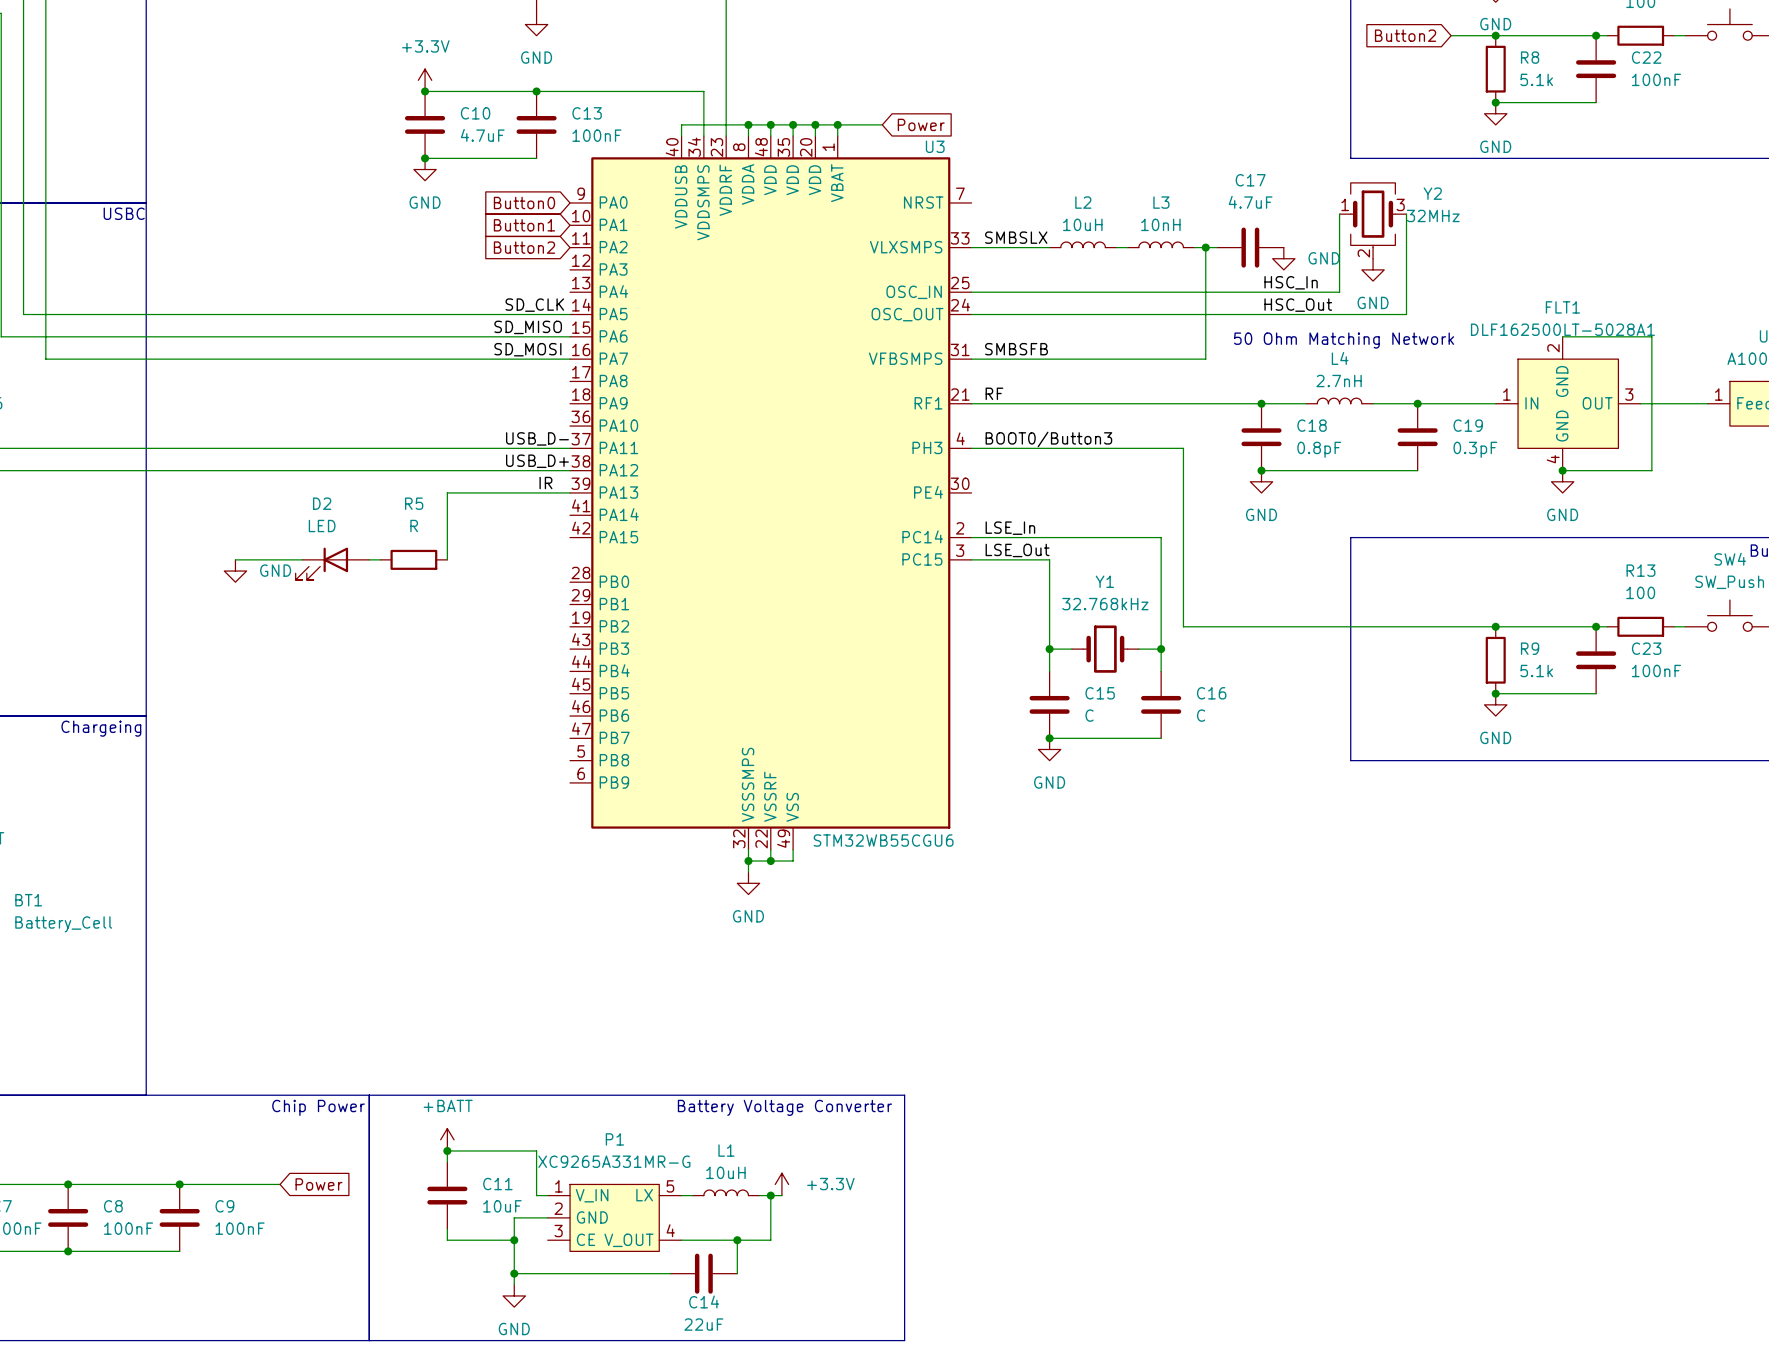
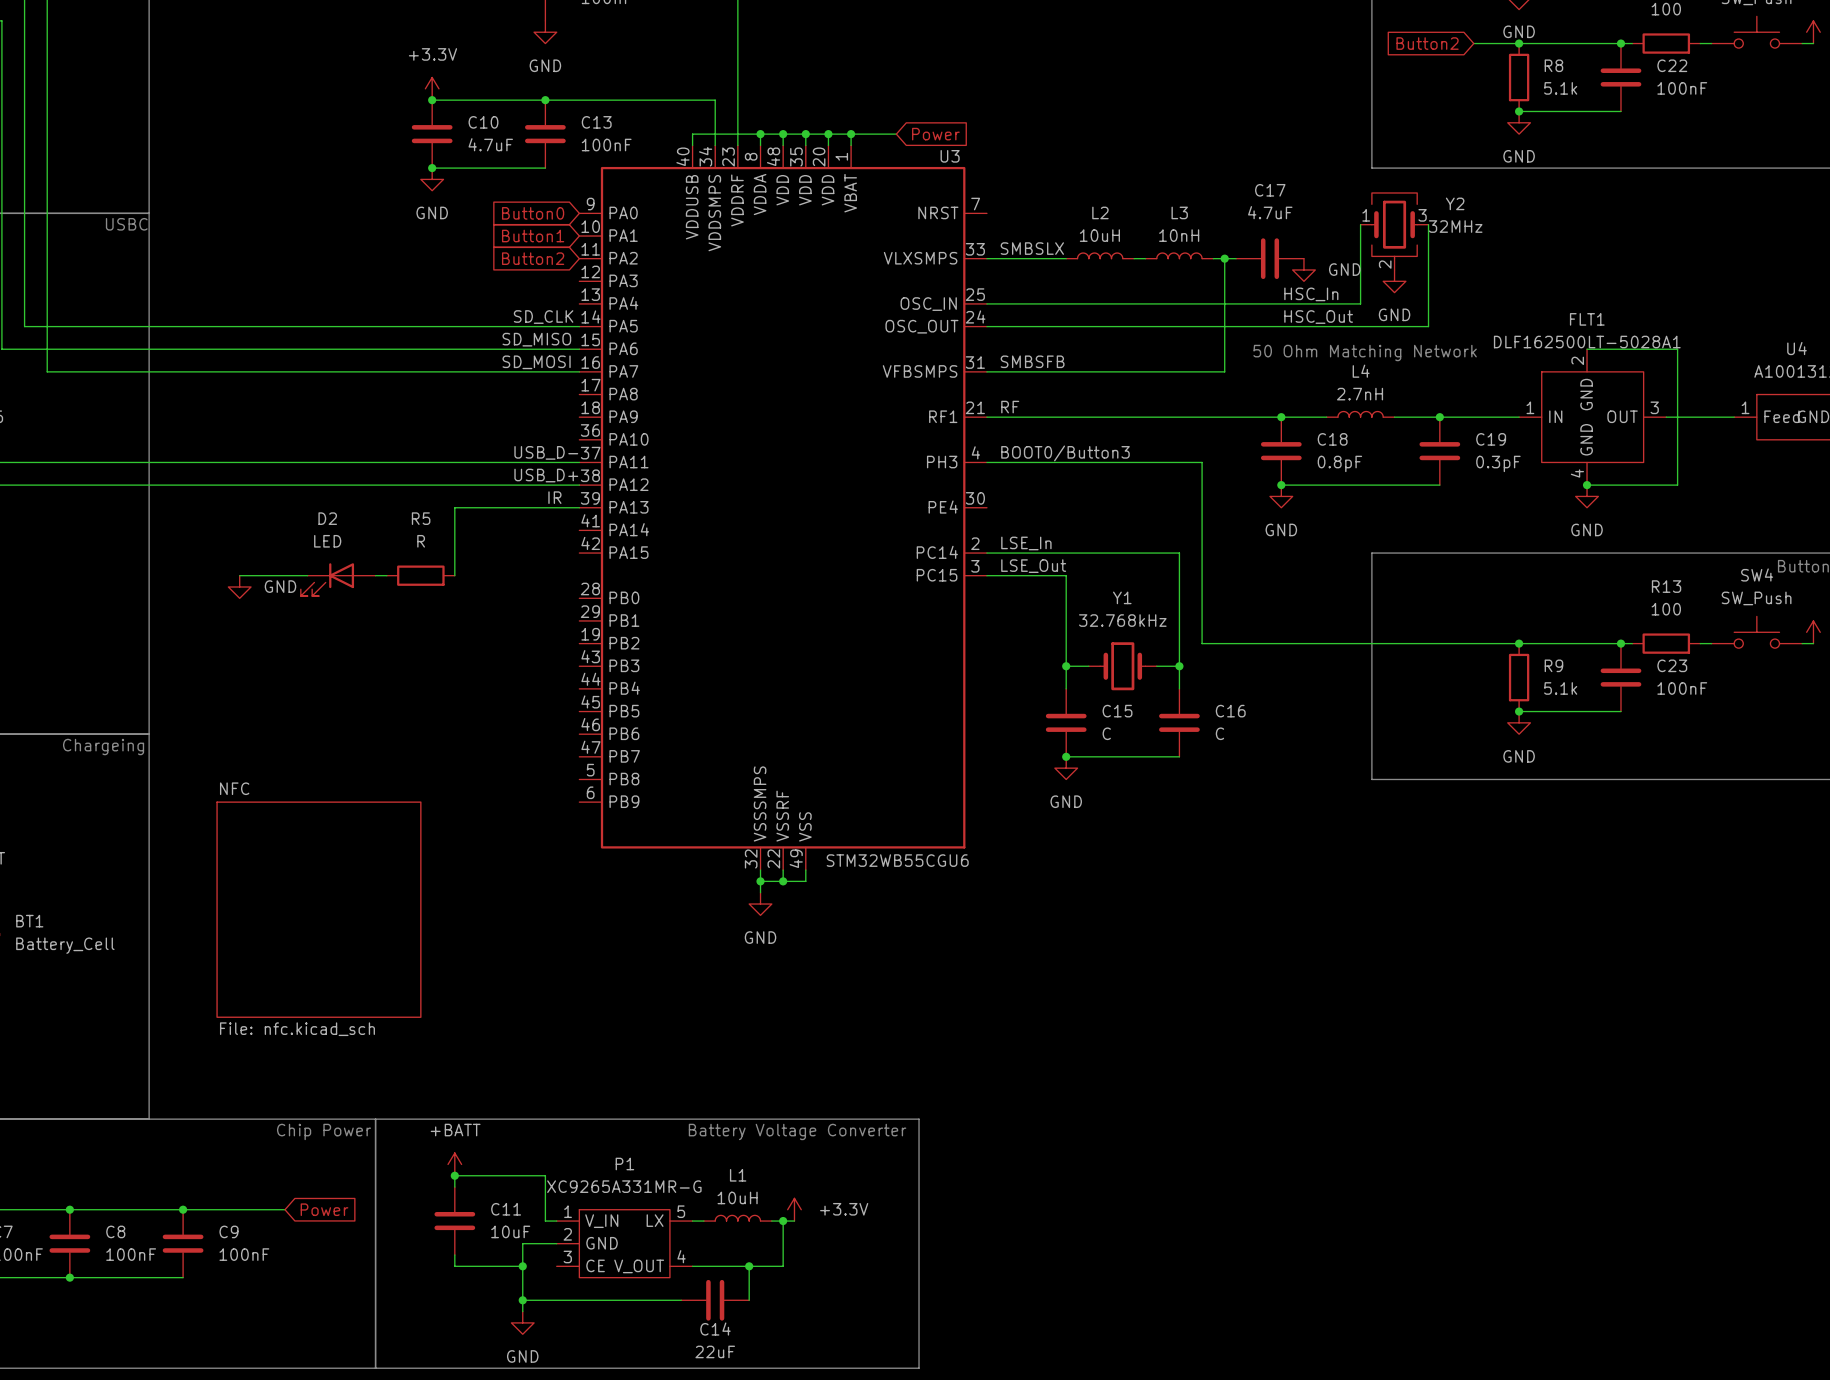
sheet NFC: none -> File: nfc.kicad_sch (318, 909)

